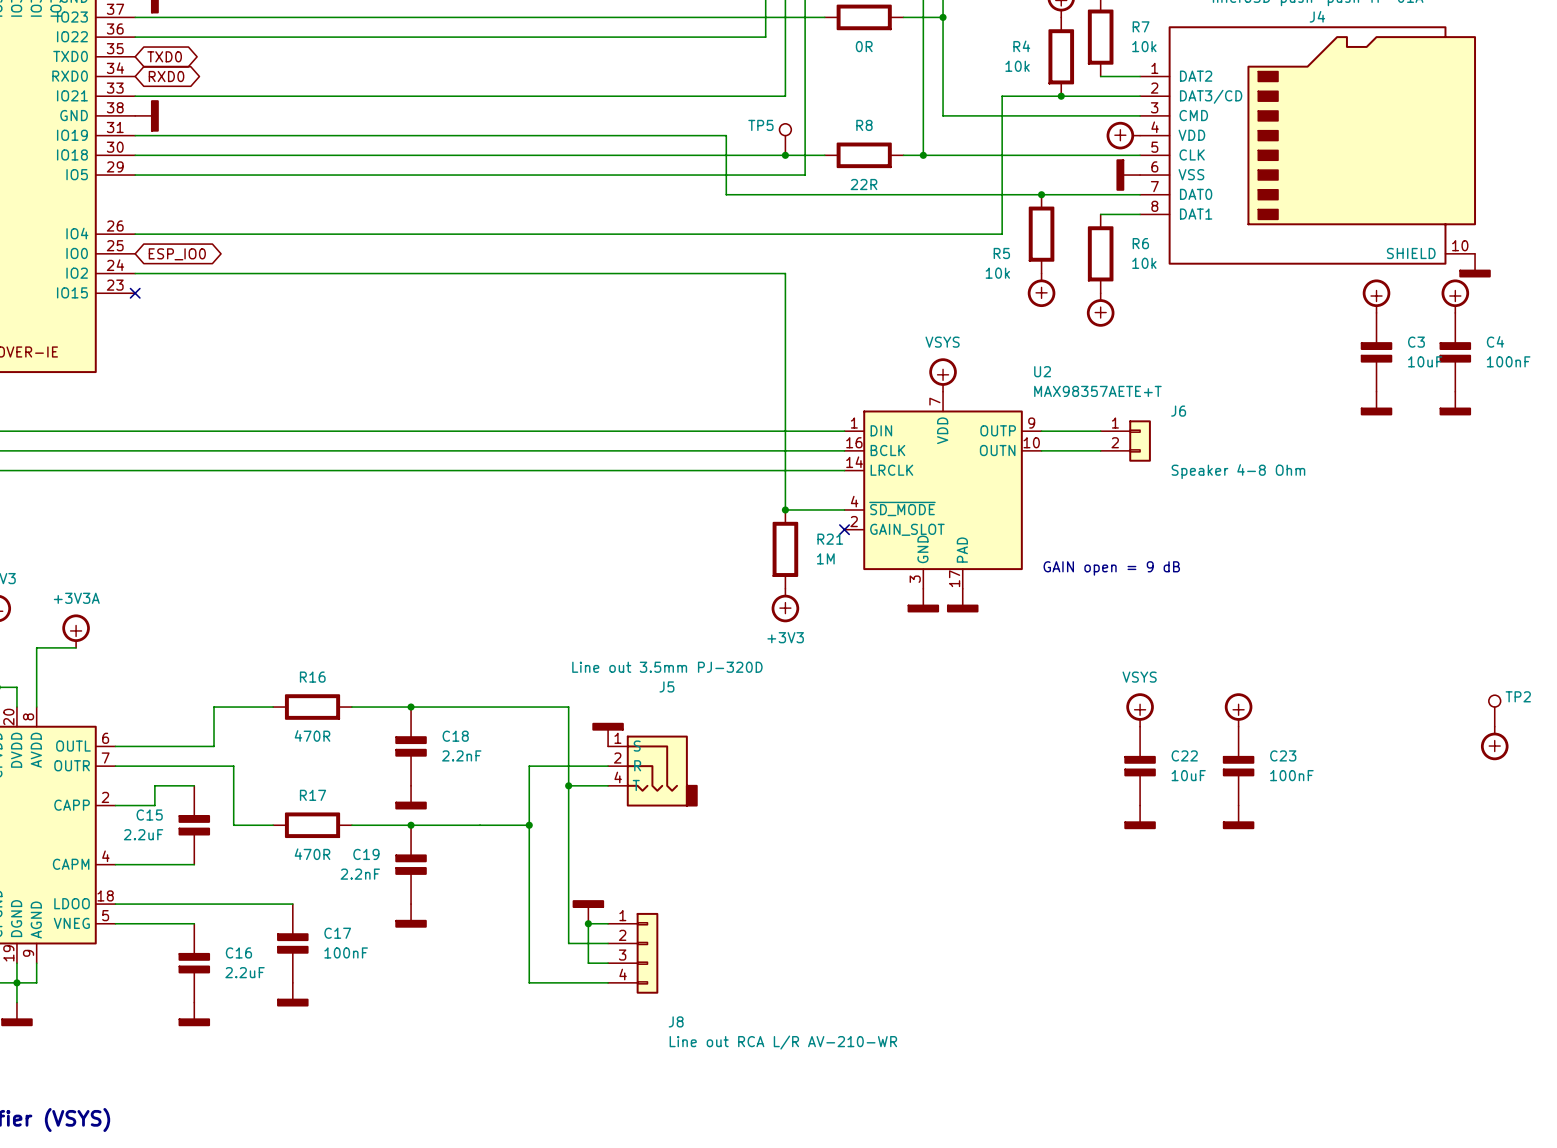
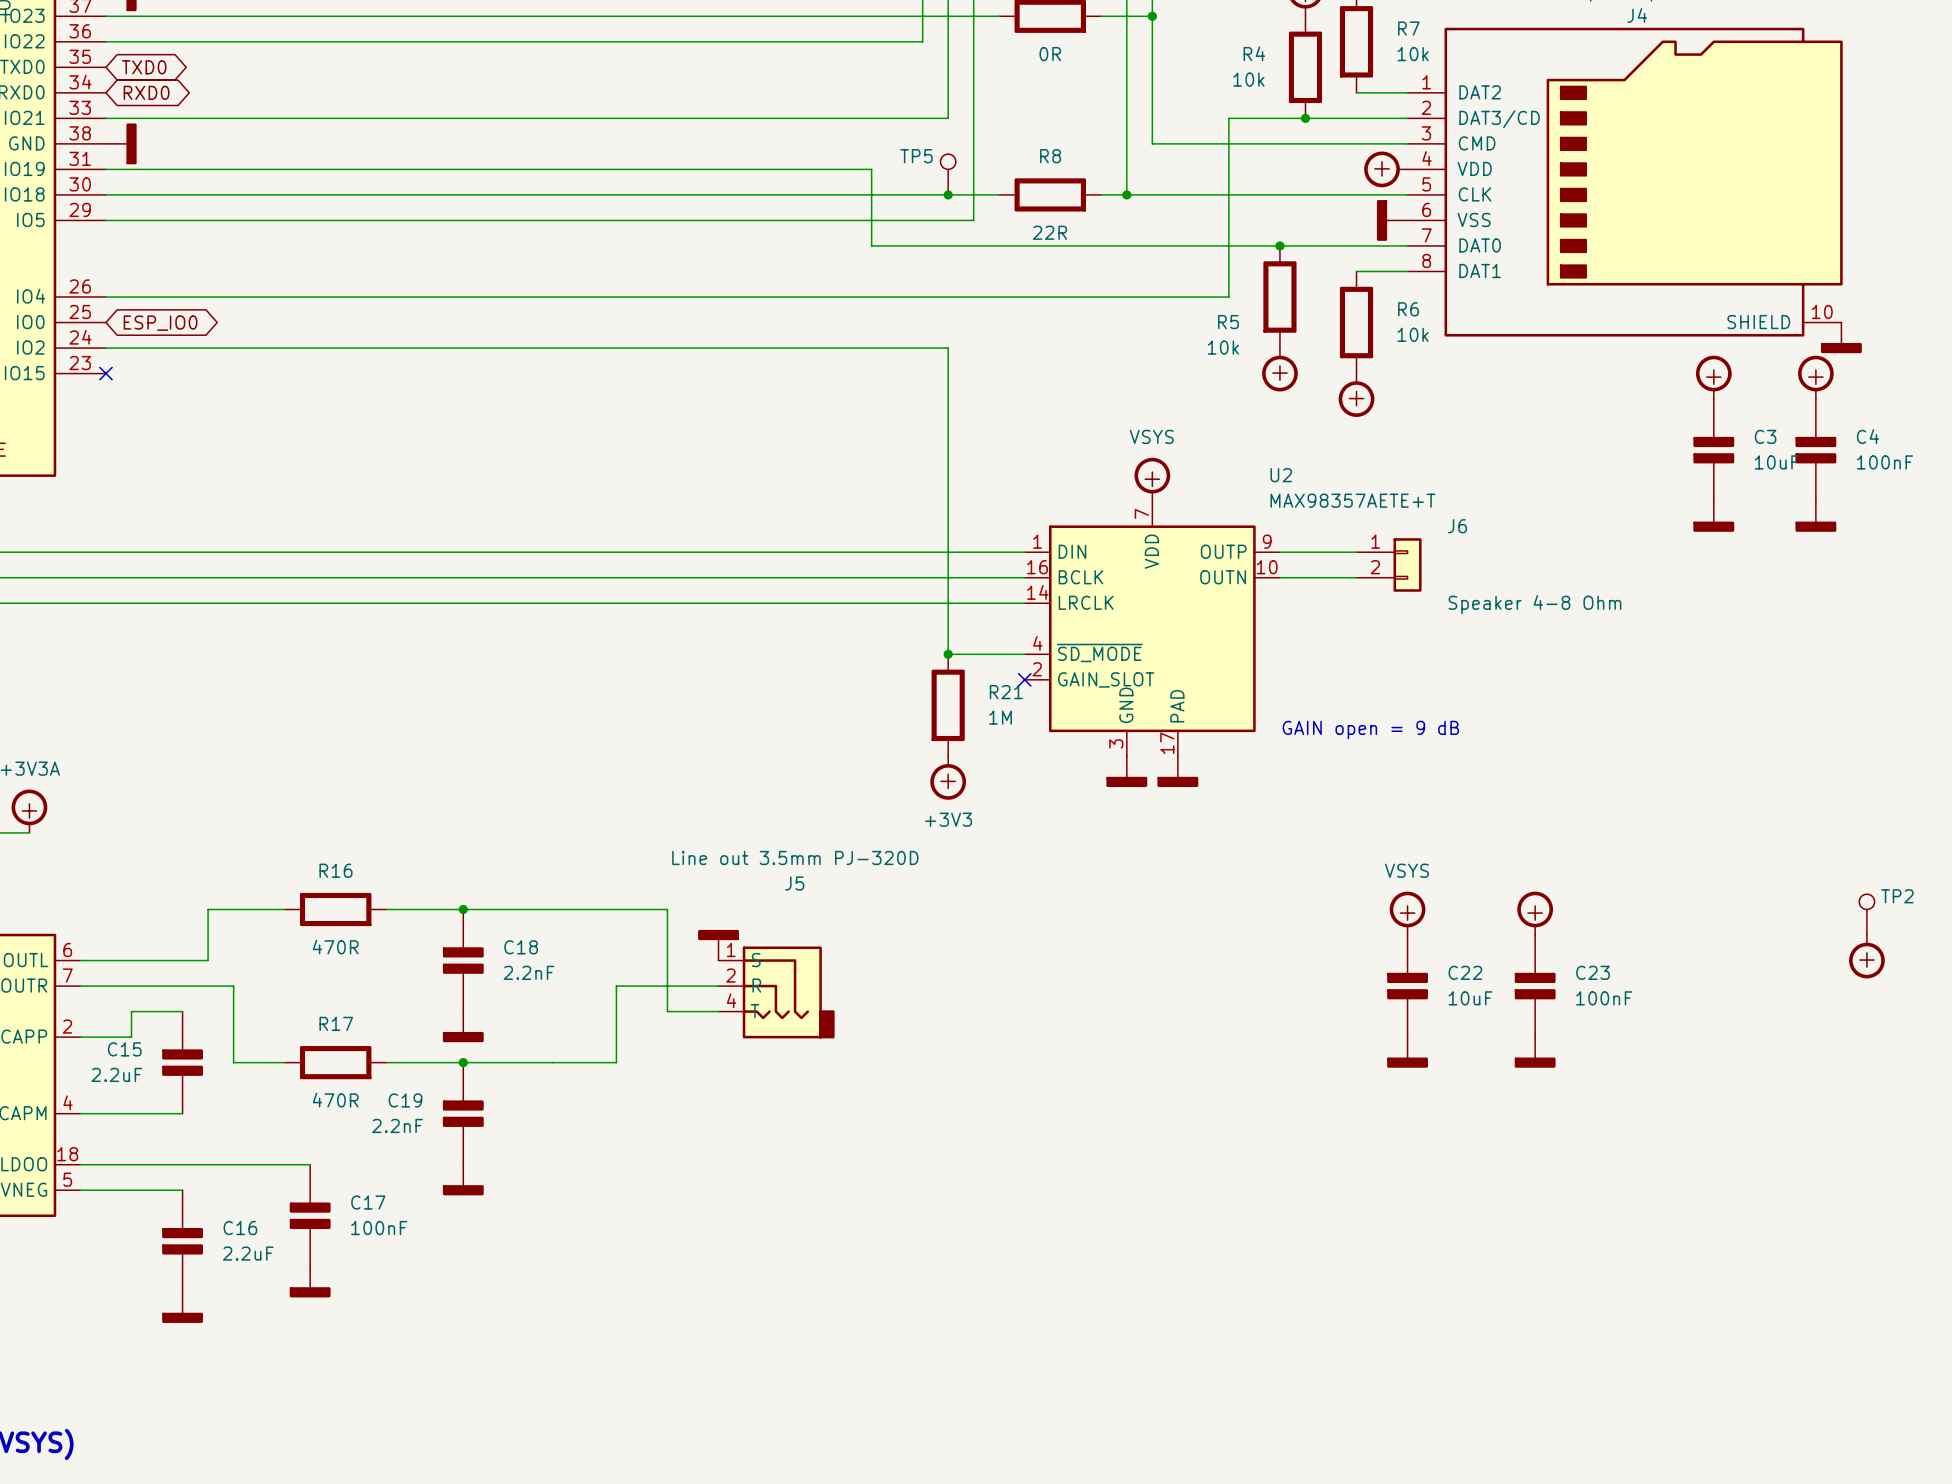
wire: (568, 785) (568, 943) (608, 943) -> none
junction: (568, 785) -> none
wire: (529, 825) (529, 982) (608, 982) -> none
junction: (529, 825) -> none
power symbol: (588, 911) -> none
junction: (588, 923) -> none
wire: (608, 923) (588, 923) (588, 963) (608, 963) -> none
J8: Line out RCA L/R AV-210-WR (633, 953) -> none

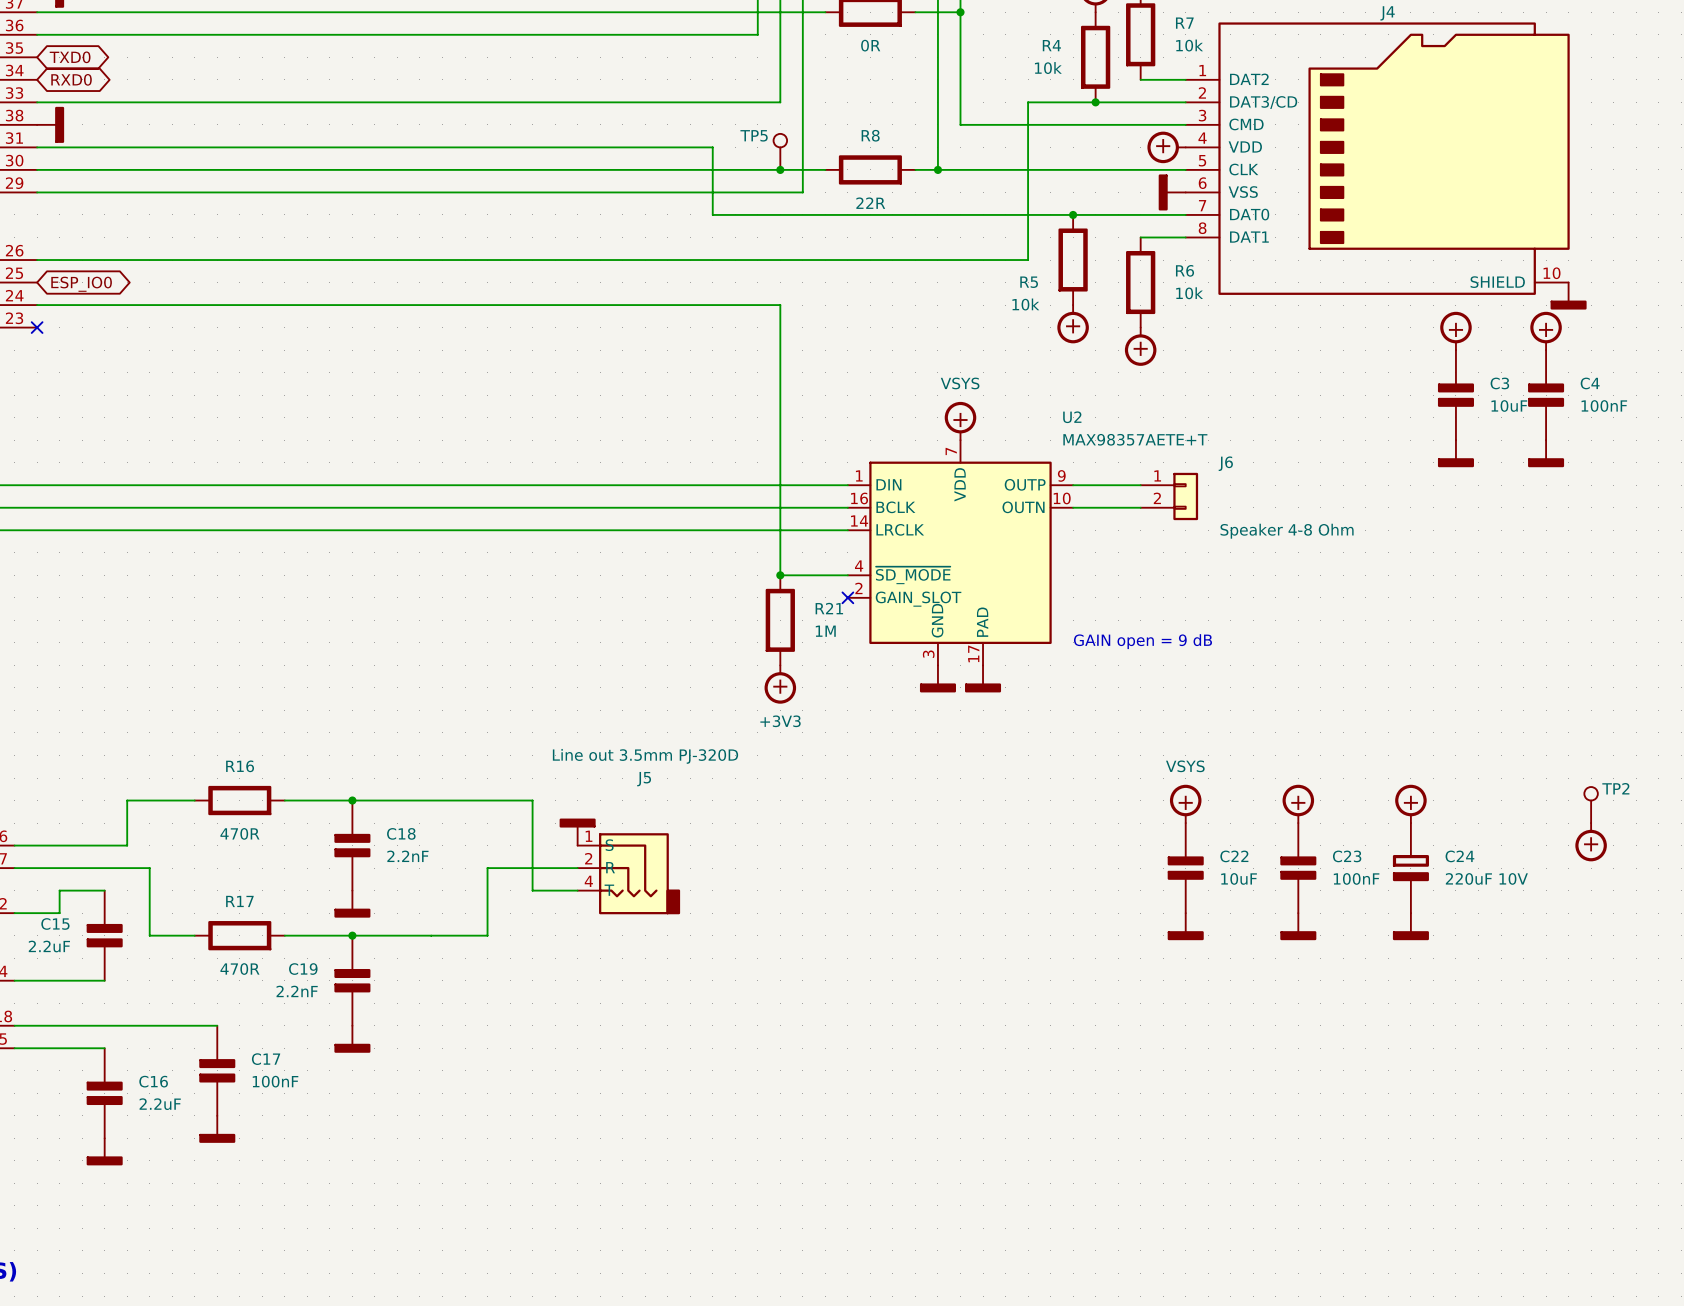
power symbol: none -> (1410, 803)
C24: none -> 220uF 10V (1410, 868)
power symbol: none -> (1410, 926)

